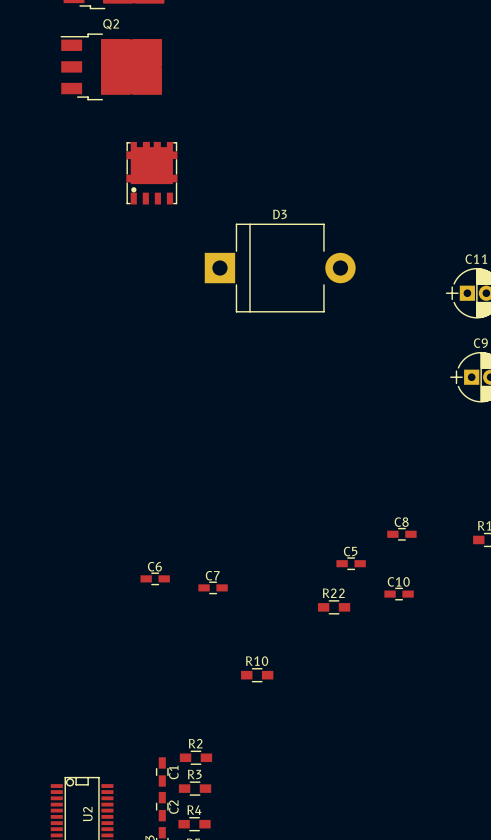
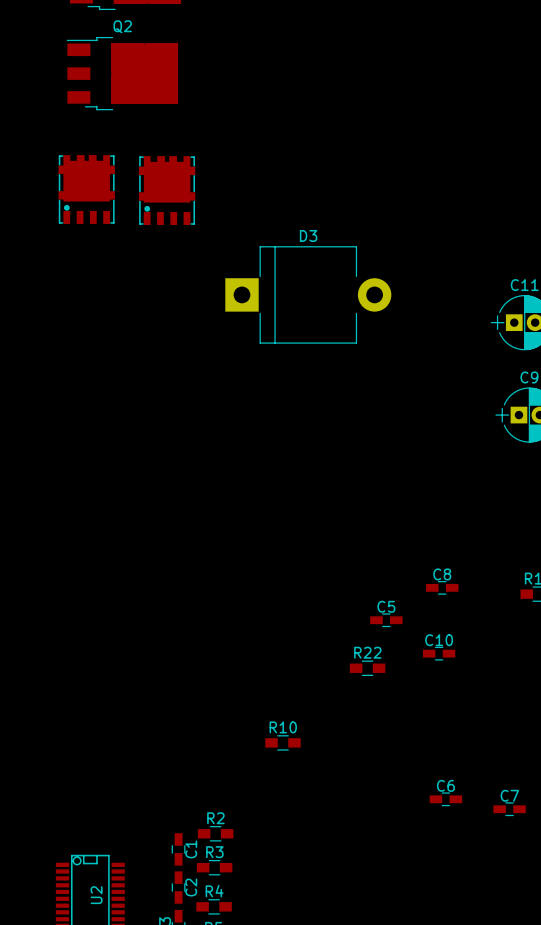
part: none -> (86, 189)
C6 position: (155, 578) -> (445, 799)
C7 position: (213, 587) -> (509, 809)

